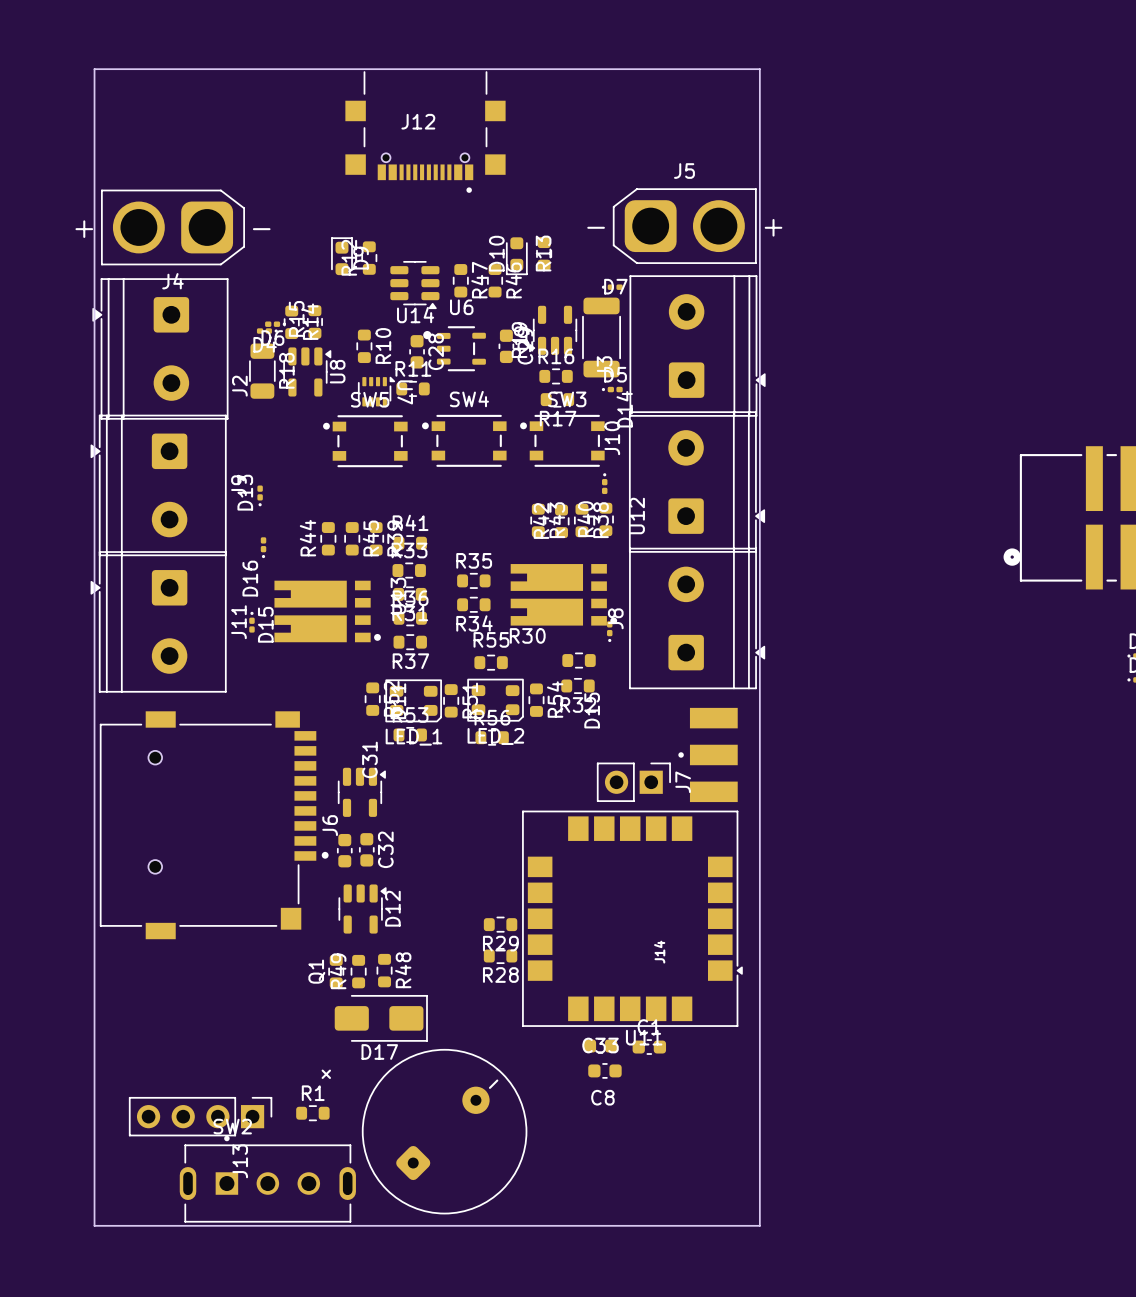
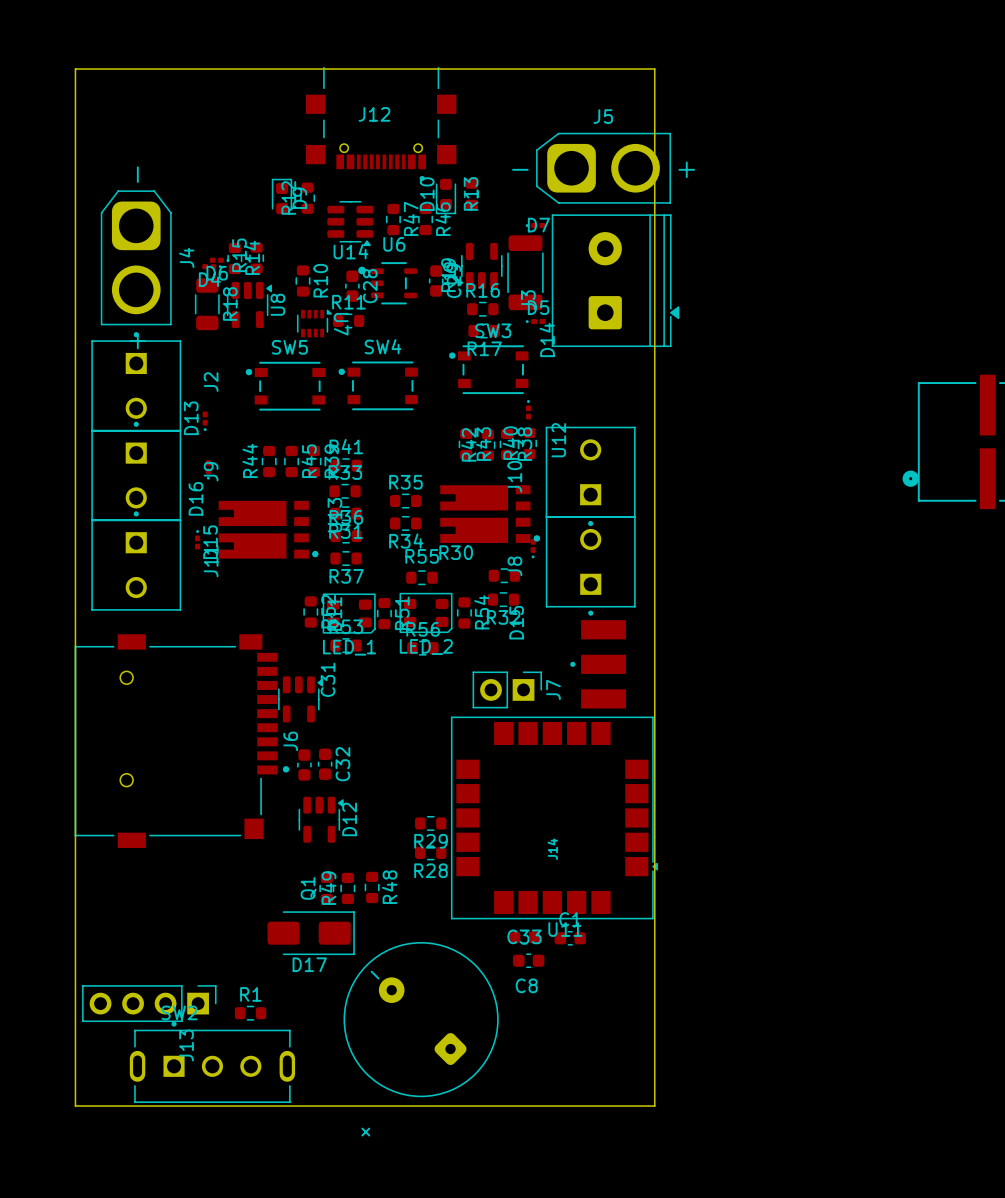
J12 position: (425, 132) -> (381, 124)
J4 rotation: 0° (173, 227) -> 90° counterclockwise (136, 257)
J4 position: (173, 227) -> (136, 257)
J2 footprint: [92, 278, 229, 420] -> [91, 332, 182, 432]
J2 name position: J2 (239, 386) -> J2 (211, 382)
J10 footprint: [629, 411, 766, 553] -> [545, 426, 636, 527]
J9 footprint: [90, 414, 227, 557] -> [91, 421, 182, 522]
J10 name position: J10 (612, 438) -> J10 (514, 476)
SW4 position: (464, 440) -> (378, 385)
SW5 position: (365, 441) -> (285, 386)
J8 footprint: [629, 547, 766, 690] -> [545, 516, 636, 616]
J11 footprint: [90, 551, 227, 693] -> [91, 511, 182, 611]
J14 position: (708, 754) -> (598, 664)
J7 position: (633, 782) -> (507, 689)
J6 position: (214, 825) -> (181, 741)
C32 position: (366, 849) -> (325, 764)
C31 position: (344, 850) -> (304, 764)
D12 position: (362, 909) -> (321, 819)
R48 position: (384, 970) -> (372, 887)
Q1 position: (336, 971) -> (326, 888)
R49 position: (358, 971) -> (347, 888)
D17 position: (381, 1018) -> (311, 933)
R1 position: (312, 1113) -> (250, 1013)
part rotation: 0° (444, 1131) -> 90° counterclockwise (421, 1019)
board edge: (121, 1225) (94, 1225) (94, 69) (759, 69) (759, 1225) (739, 1225) -> (75, 1106) (75, 69) (654, 69) (654, 1106)

